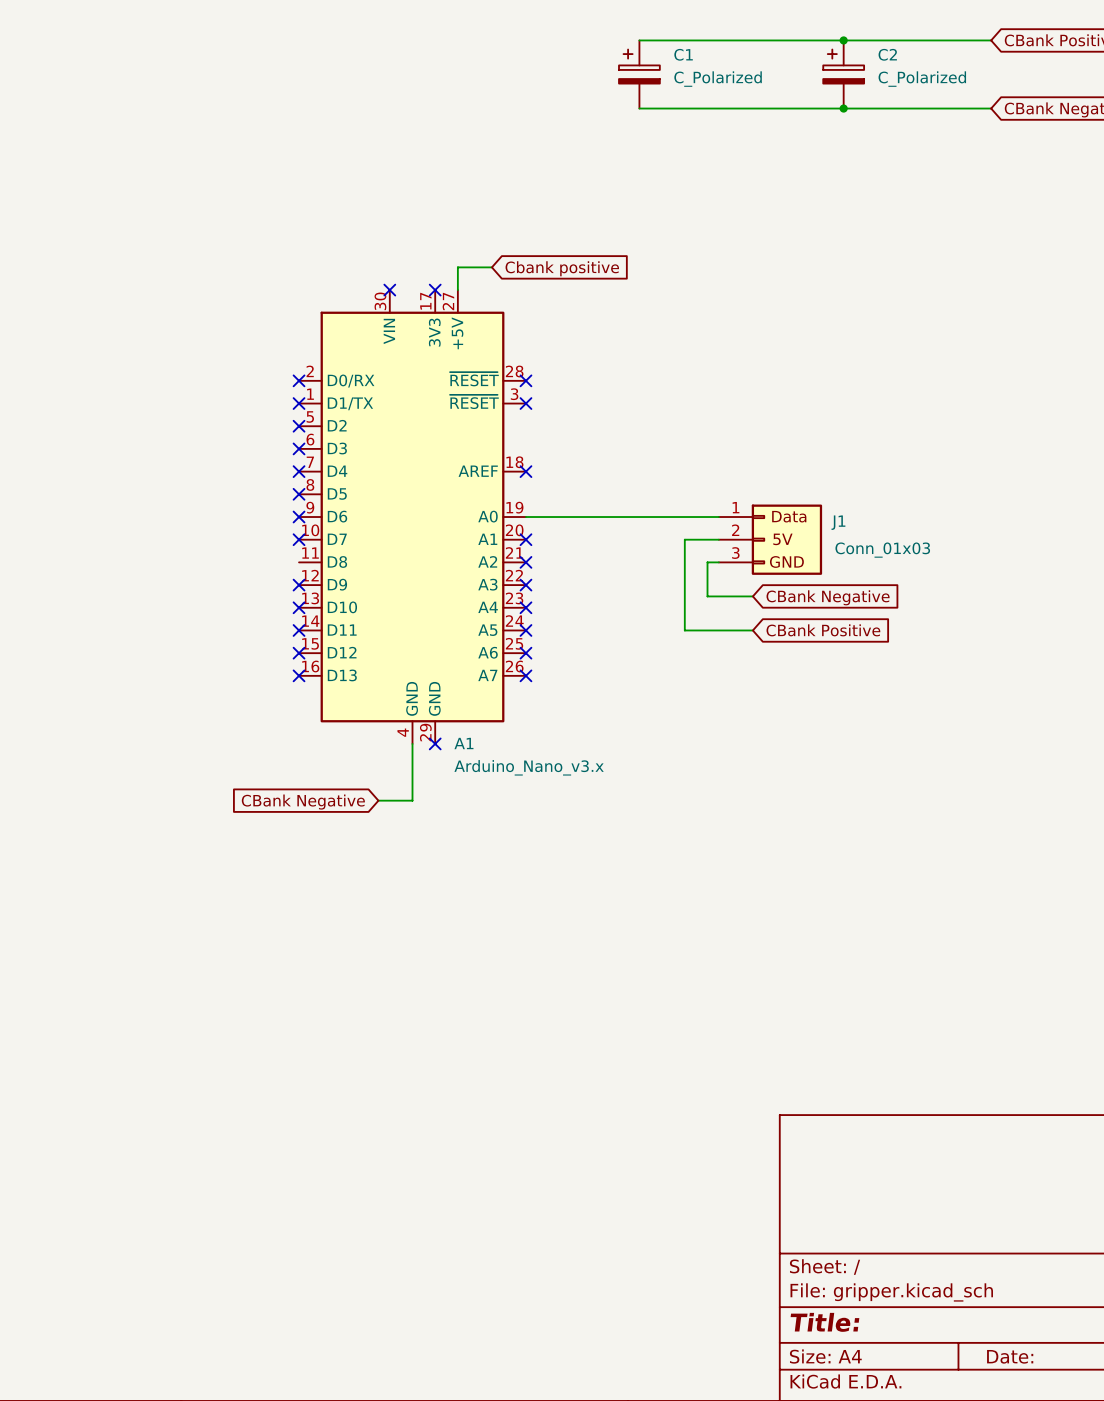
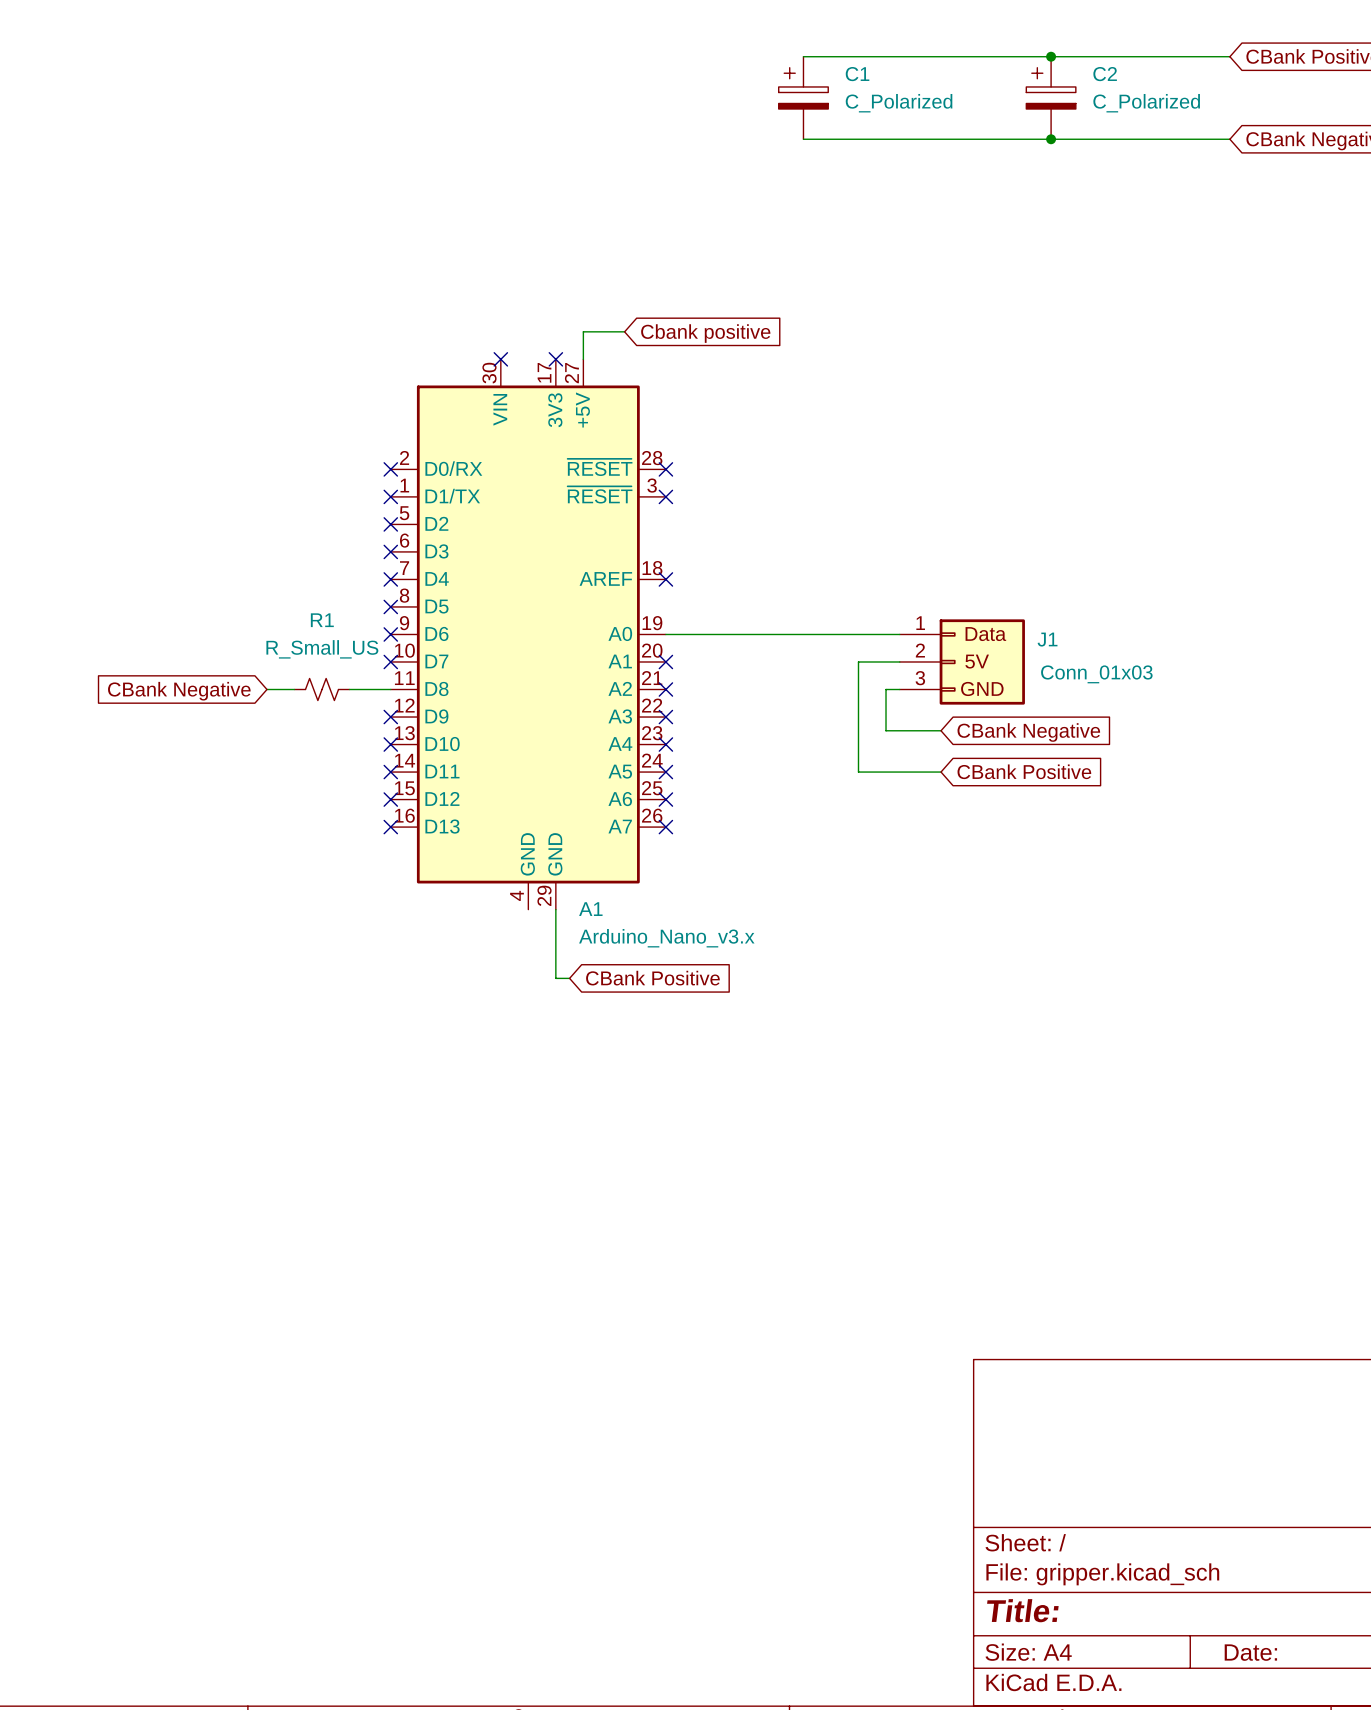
wire: none -> (266, 689) (294, 689)
R1: none -> R_Small_US (322, 689)
wire: none -> (349, 689) (390, 689)
global label: none -> CBank Negative (179, 691)
wire: (412, 743) (412, 800) (378, 800) -> none
wire: none -> (555, 909) (555, 978) (569, 978)
no-connect mark: (435, 743) -> none
global label: none -> CBank Positive (652, 978)
global label: CBank Negative (303, 802) -> none

